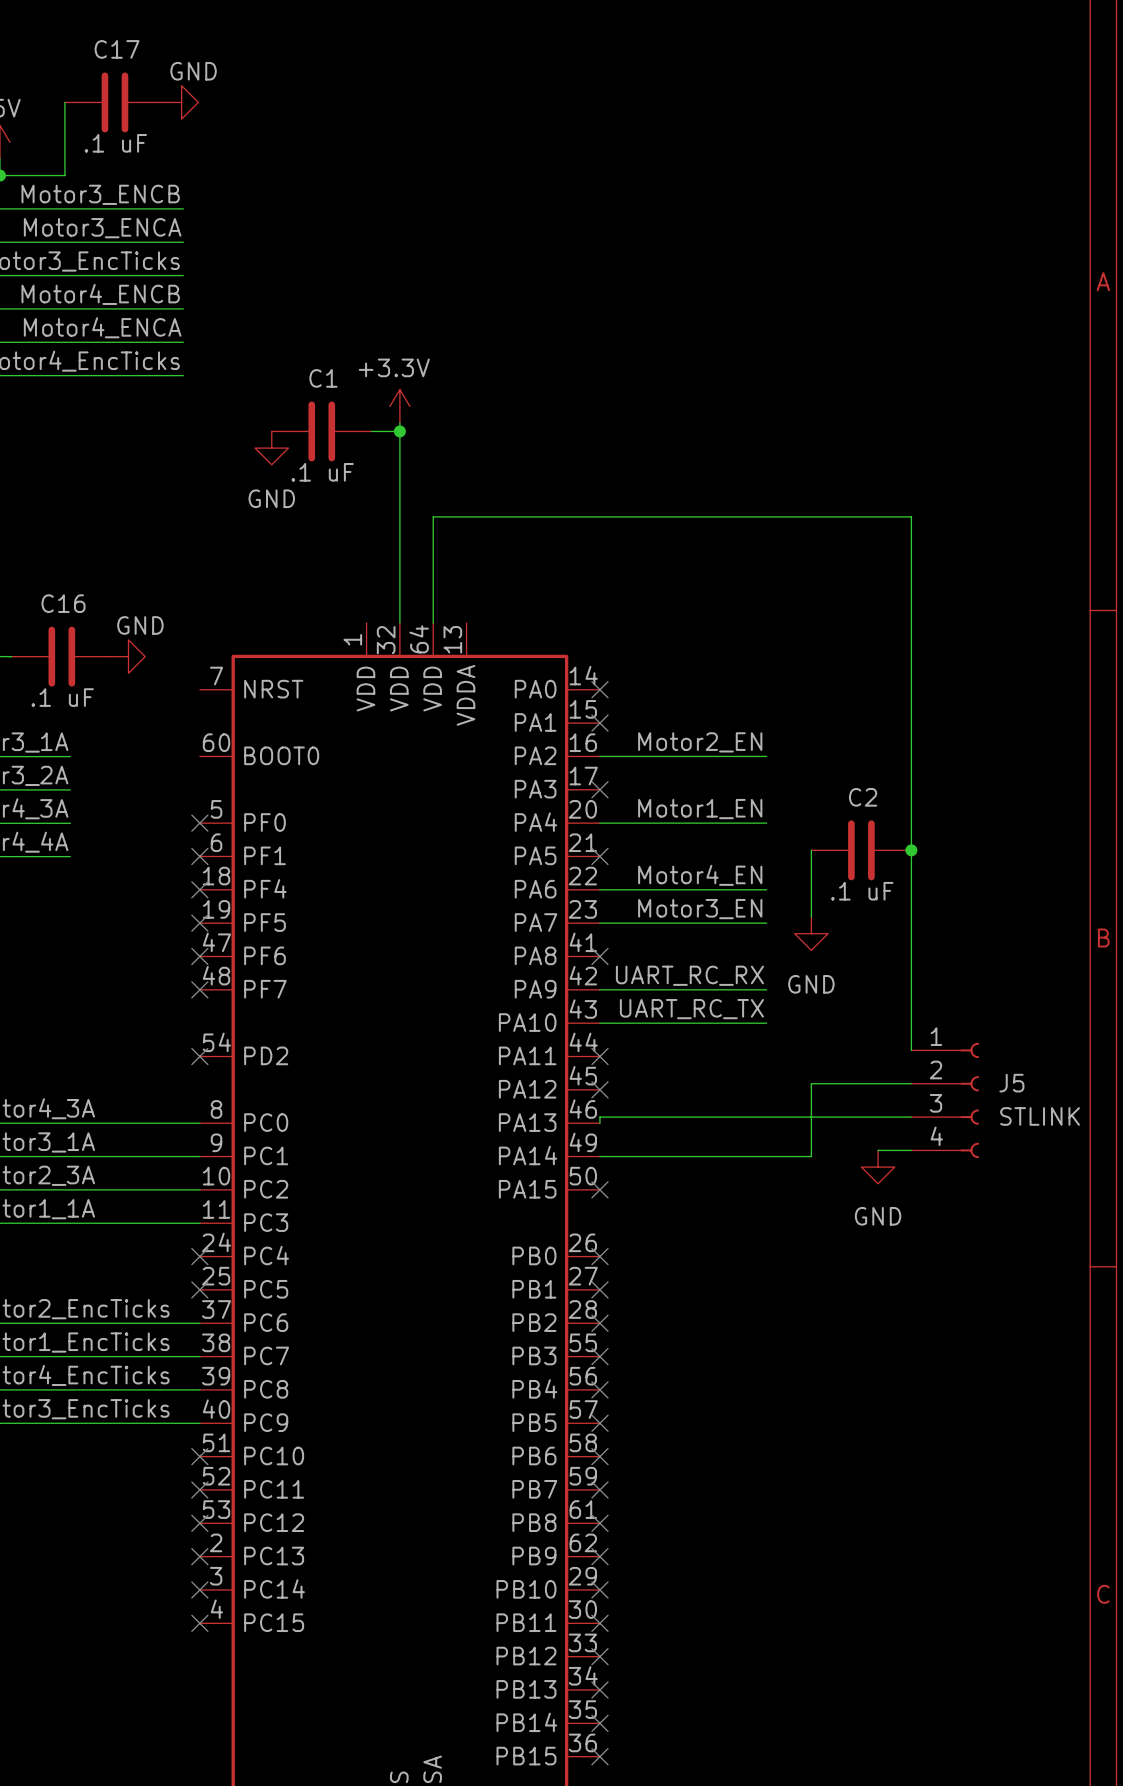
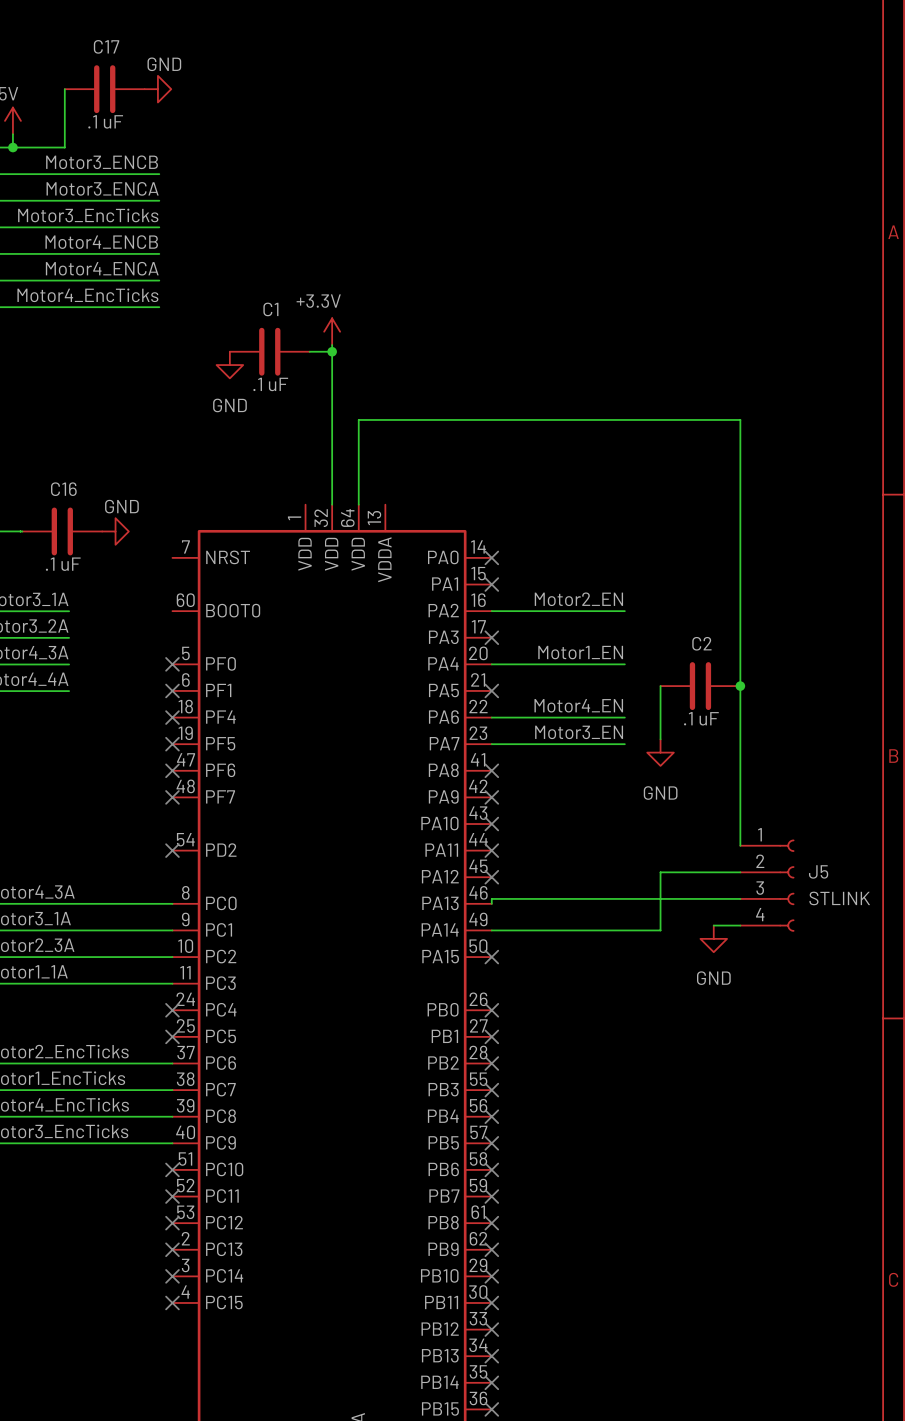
label: UART_RC_RX (689, 975) -> none
wire: (599, 989) (766, 989) -> none
no-connect mark: none -> (491, 797)
label: UART_RC_TX (691, 1009) -> none
wire: (599, 1023) (766, 1023) -> none
no-connect mark: none -> (491, 824)

